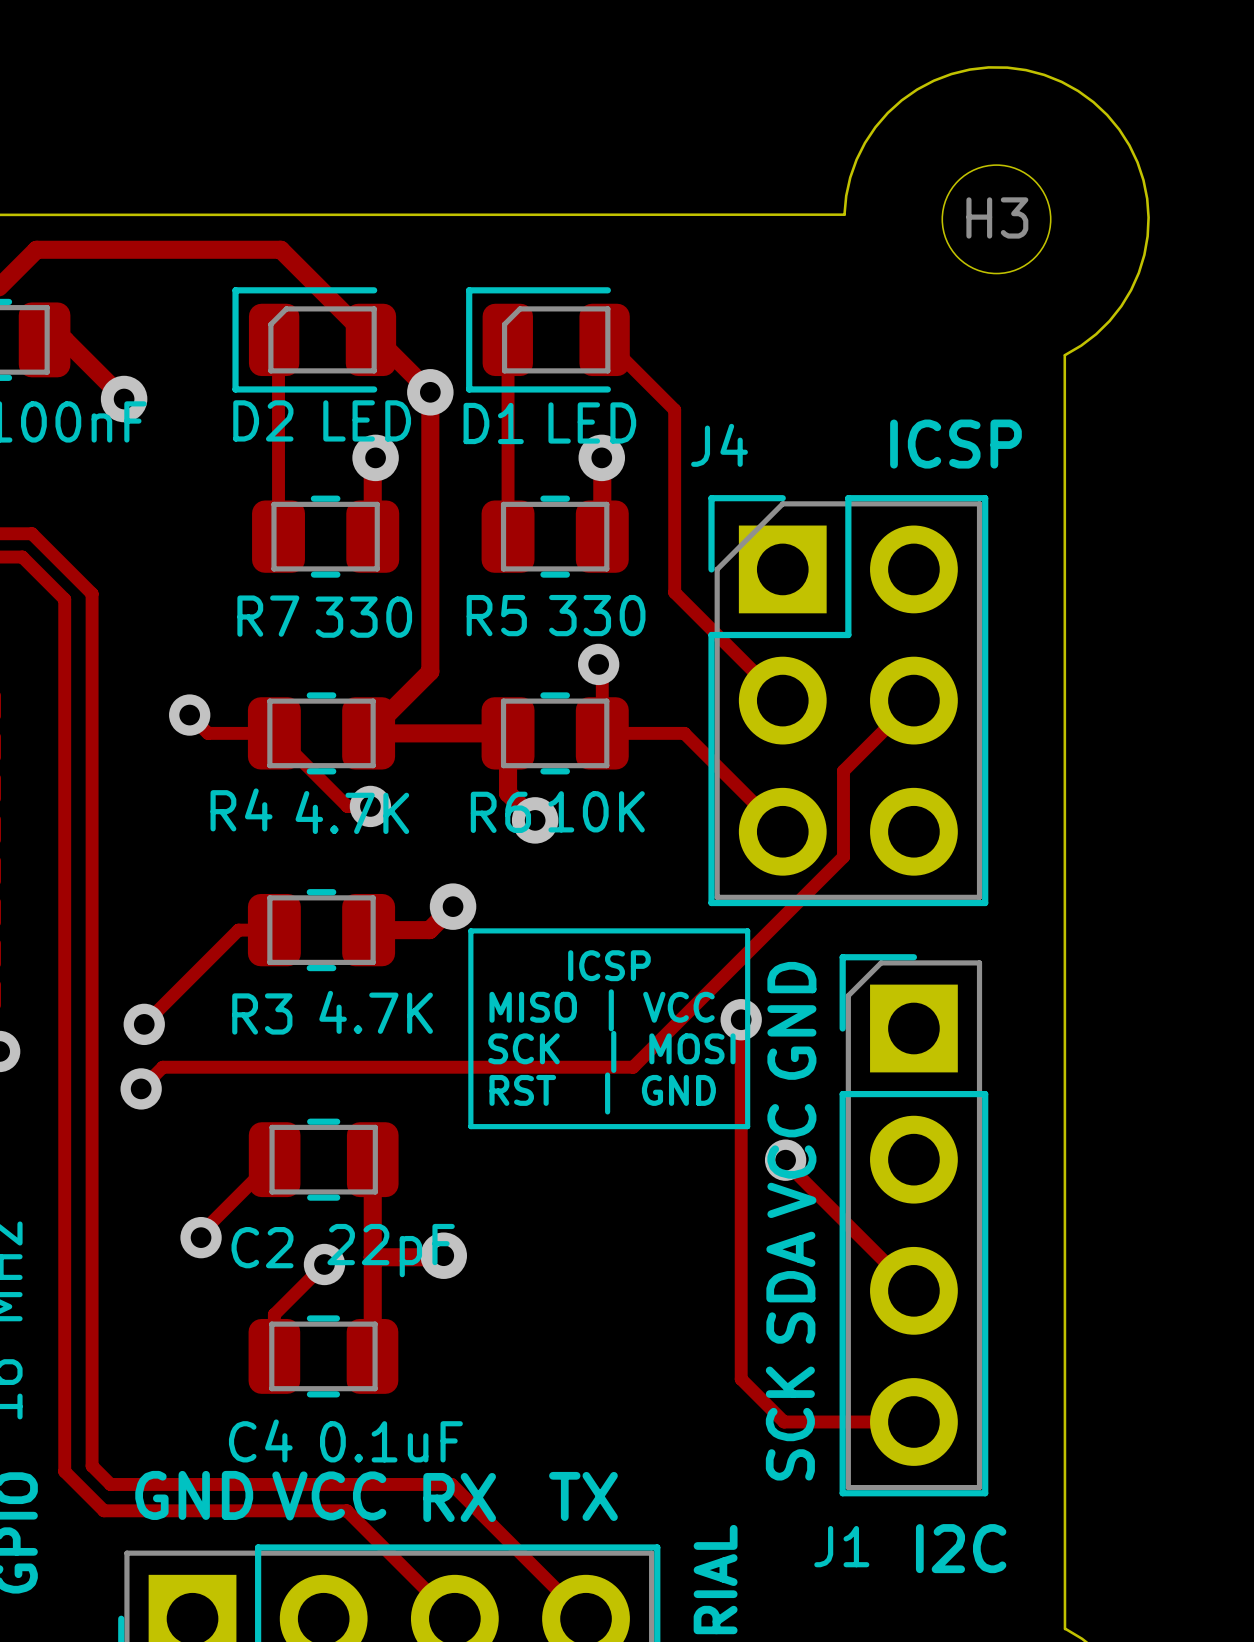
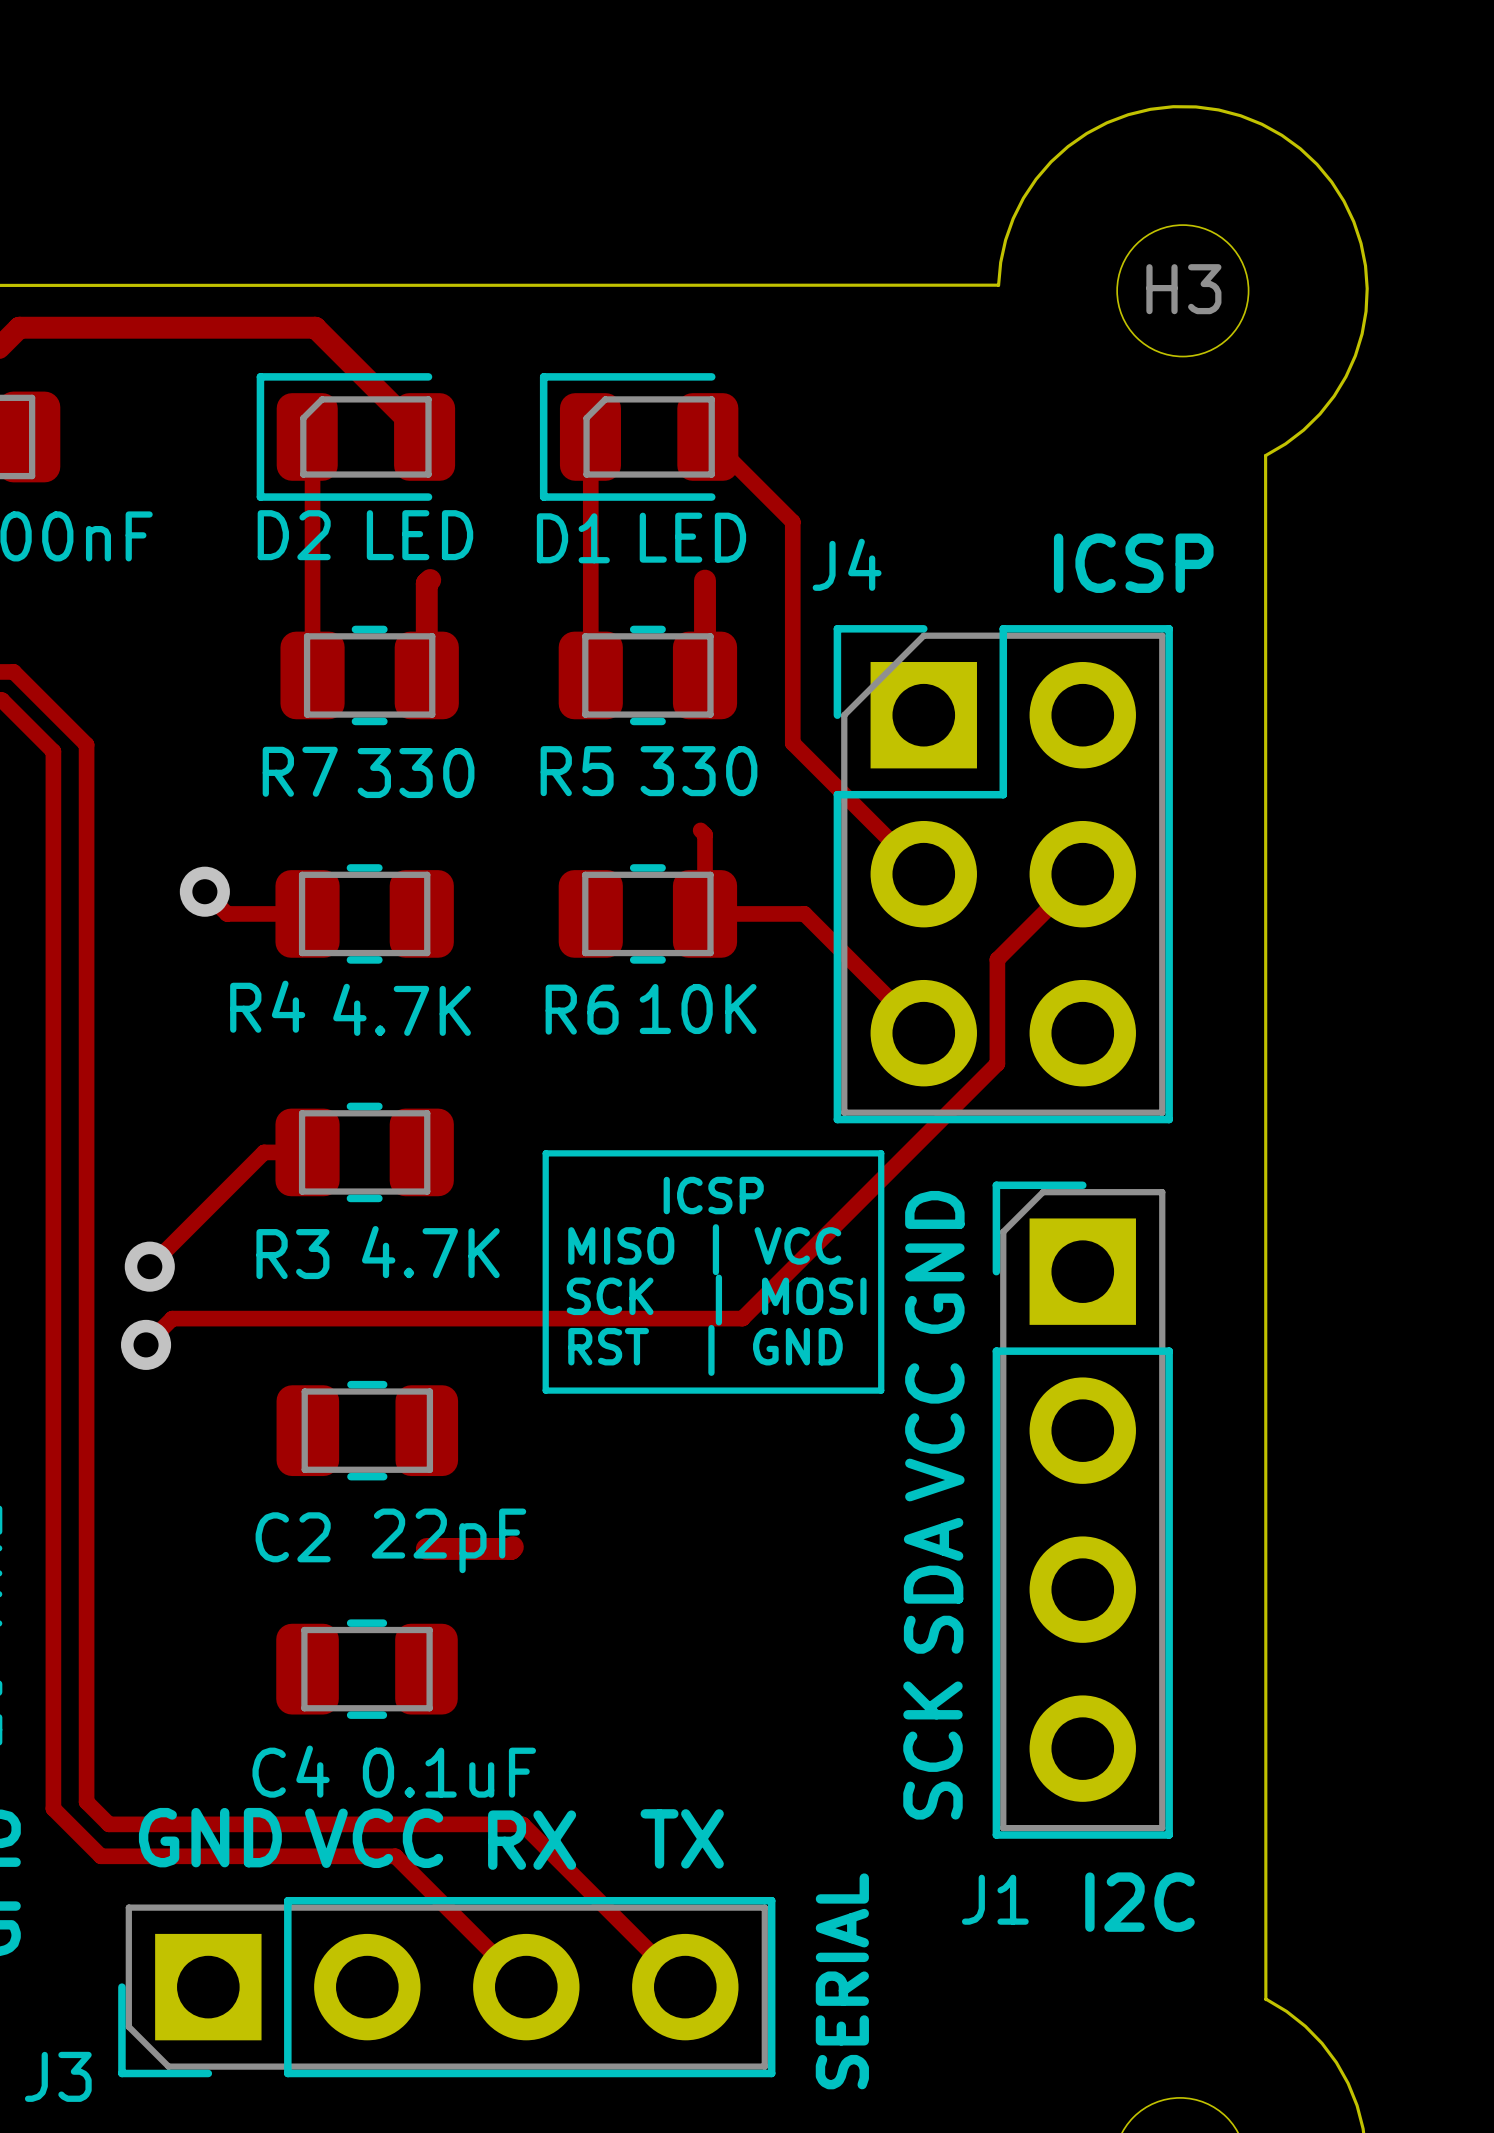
track: (44, 339) (64, 339) (124, 399) -> none
track: (370, 339) (377, 339) (430, 392) (430, 671) (368, 733) (508, 733) (508, 793) (535, 820) -> none
via: (430, 392) -> none
via: (124, 399) -> none
via: (375, 457) -> none
via: (601, 457) -> none
via: (598, 664) -> none
track: (274, 733) (347, 806) (370, 806) -> none
via: (370, 806) -> none
via: (535, 820) -> none
track: (453, 906) (429, 930) (368, 930) -> none
via: (453, 906) -> none
track: (741, 1019) (741, 1379) (784, 1421) (920, 1421) (933, 1434) -> none
via: (741, 1019) -> none
track: (274, 1159) (201, 1233) (201, 1237) -> none
track: (372, 1159) (372, 1356) -> none
track: (785, 1160) (785, 1162) (913, 1290) -> none
via: (785, 1160) -> none
via: (201, 1237) -> none
via: (443, 1255) -> none
track: (324, 1264) (274, 1314) (274, 1356) -> none
via: (324, 1264) -> none

